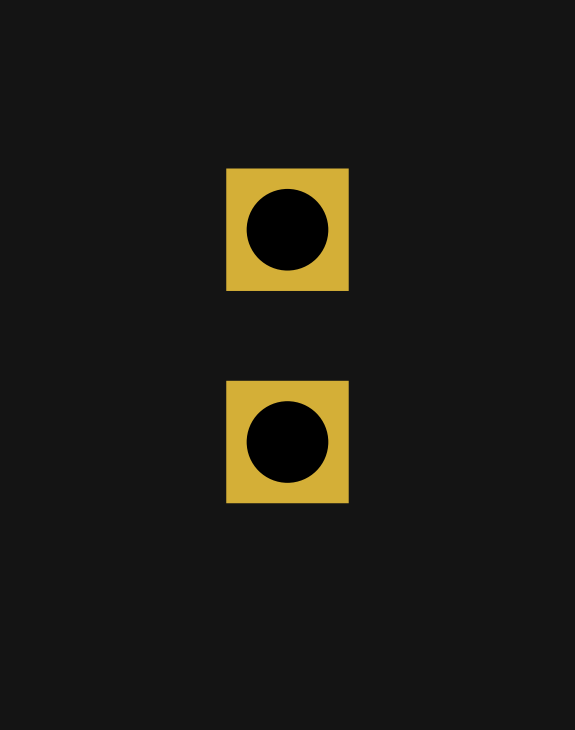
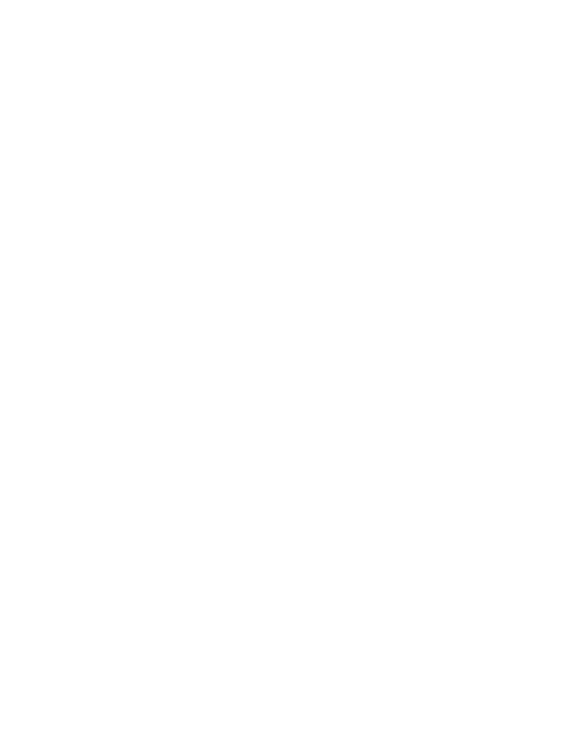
part: (287, 229) -> none
part: (287, 442) -> none

